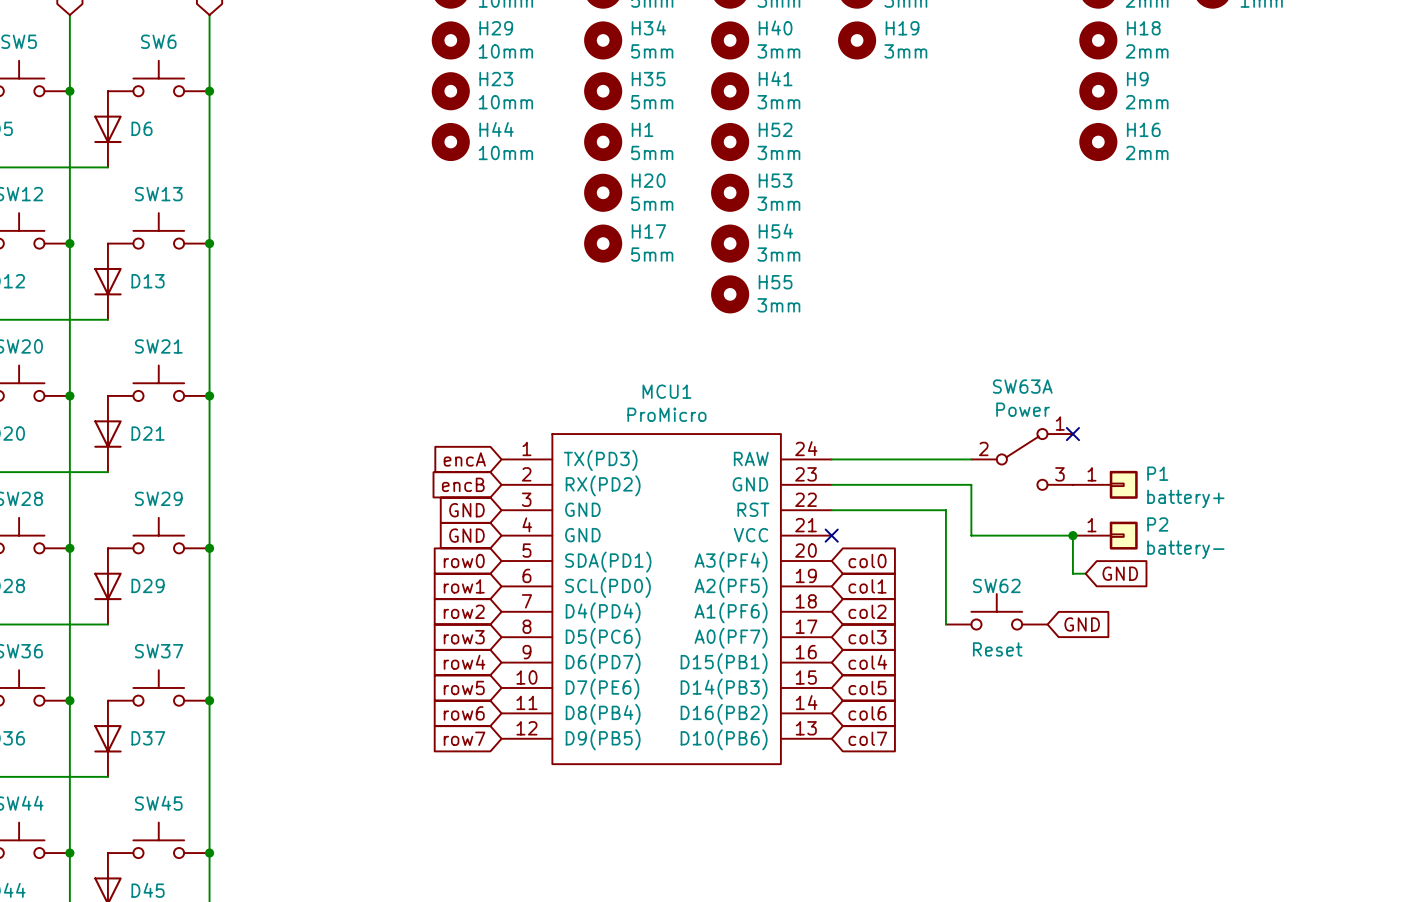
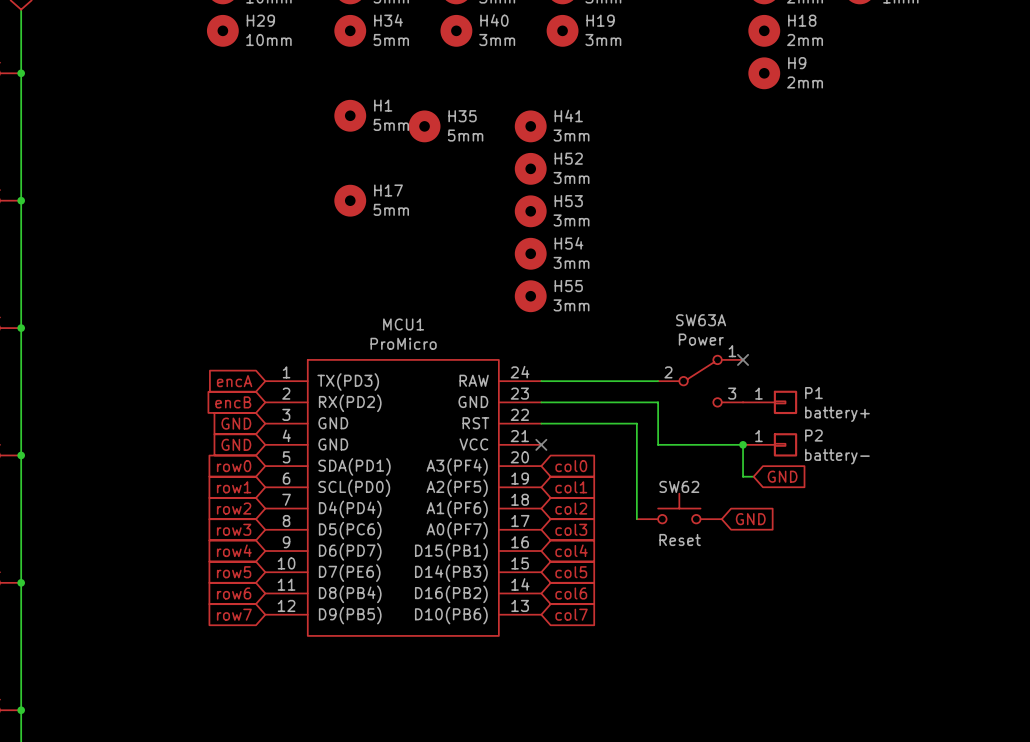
H23: 10mm (450, 91) -> none
H35 position: (603, 91) -> (424, 126)
H41 position: (730, 91) -> (530, 126)
H44: 10mm (450, 142) -> none
H52 position: (730, 142) -> (530, 168)
H16: 2mm (1098, 142) -> none
H20: 5mm (603, 192) -> none
H53 position: (730, 192) -> (530, 211)
H54 position: (730, 243) -> (530, 253)
H55 position: (730, 294) -> (530, 296)

